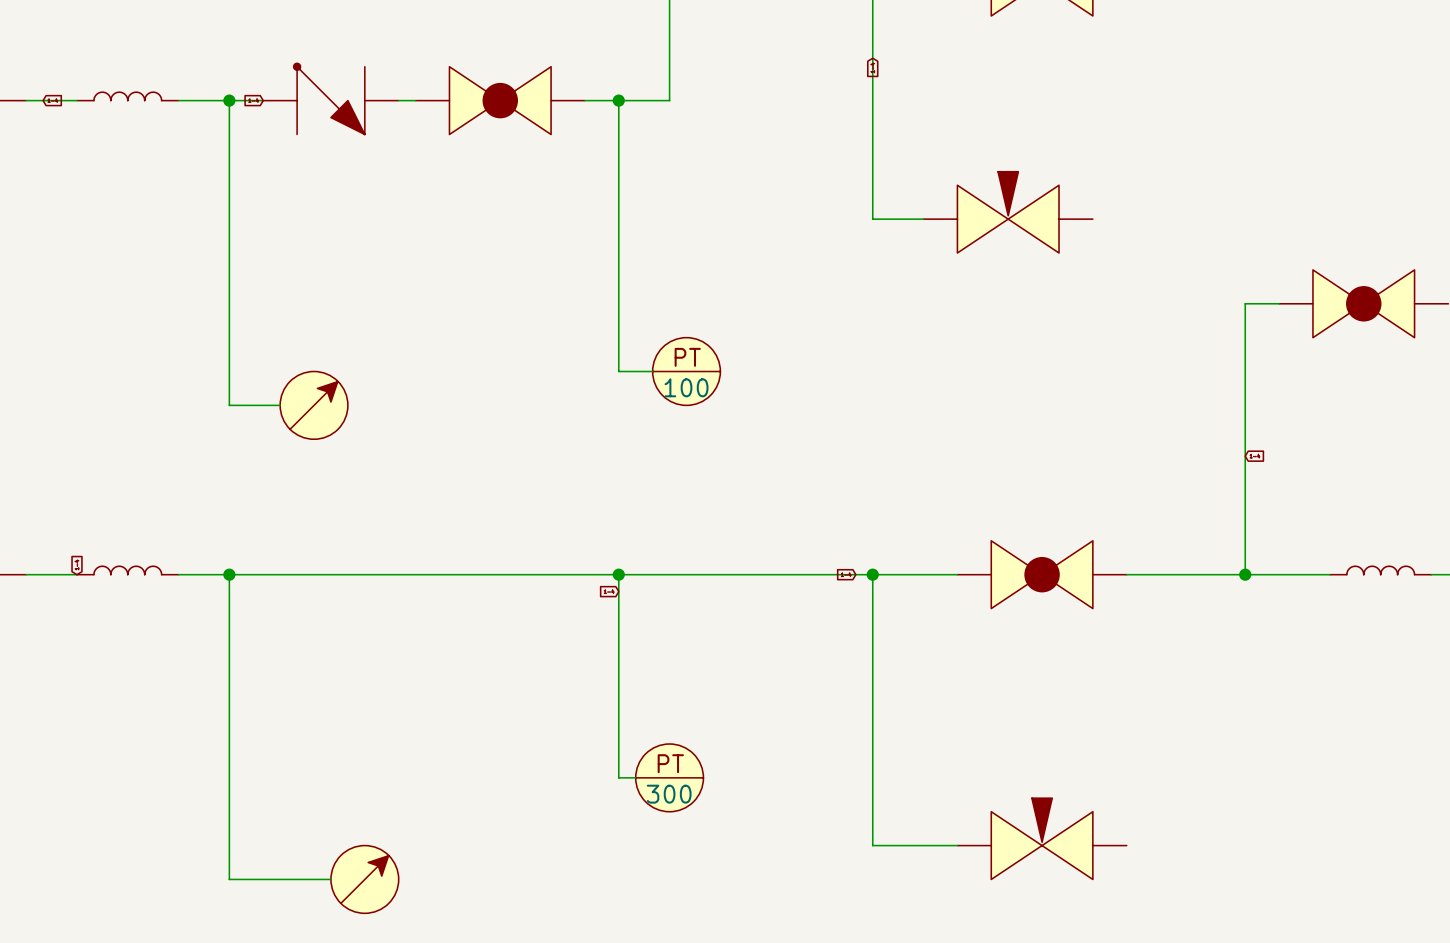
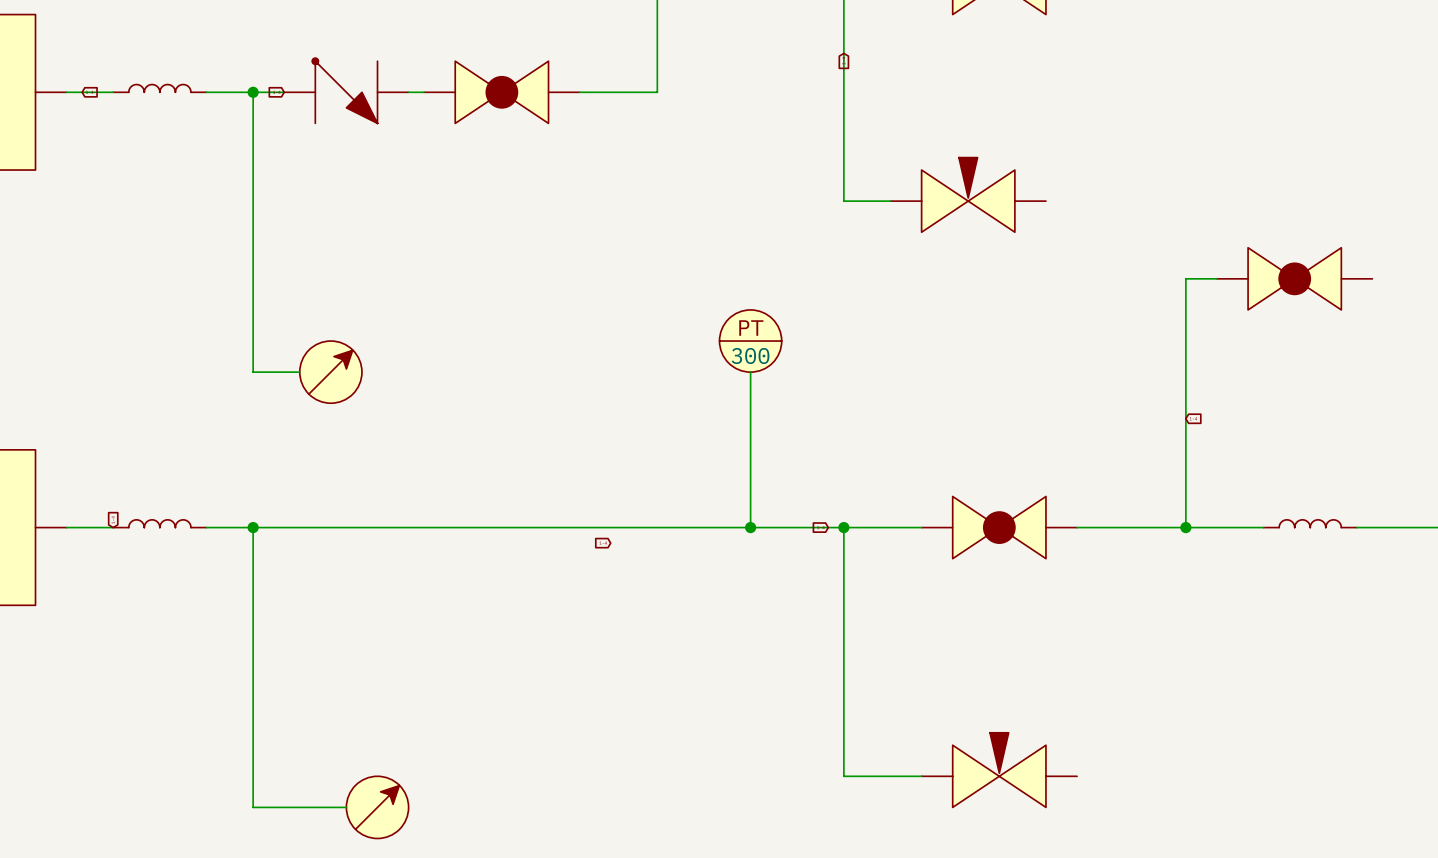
wire: (618, 100) (618, 371) (652, 371) -> none
junction: (618, 100) -> none
part: 100 (686, 371) -> none
part: none -> 300 (750, 341)
wire: none -> (750, 372) (750, 527)
wire: (618, 574) (618, 777) (635, 777) -> none
junction: (618, 574) -> none
junction: none -> (750, 527)
part: 300 (669, 777) -> none

